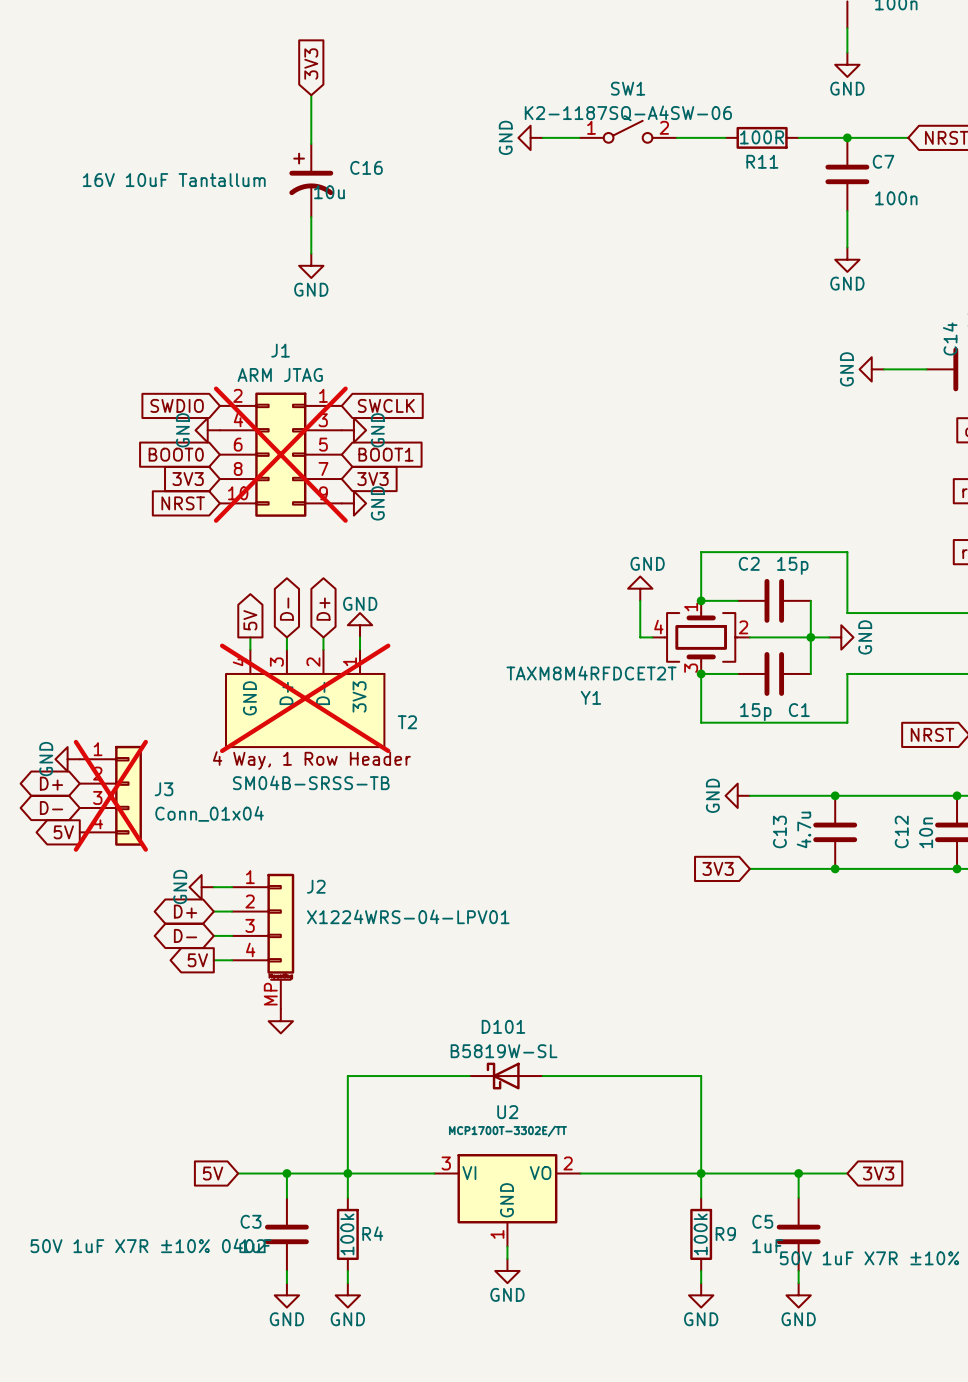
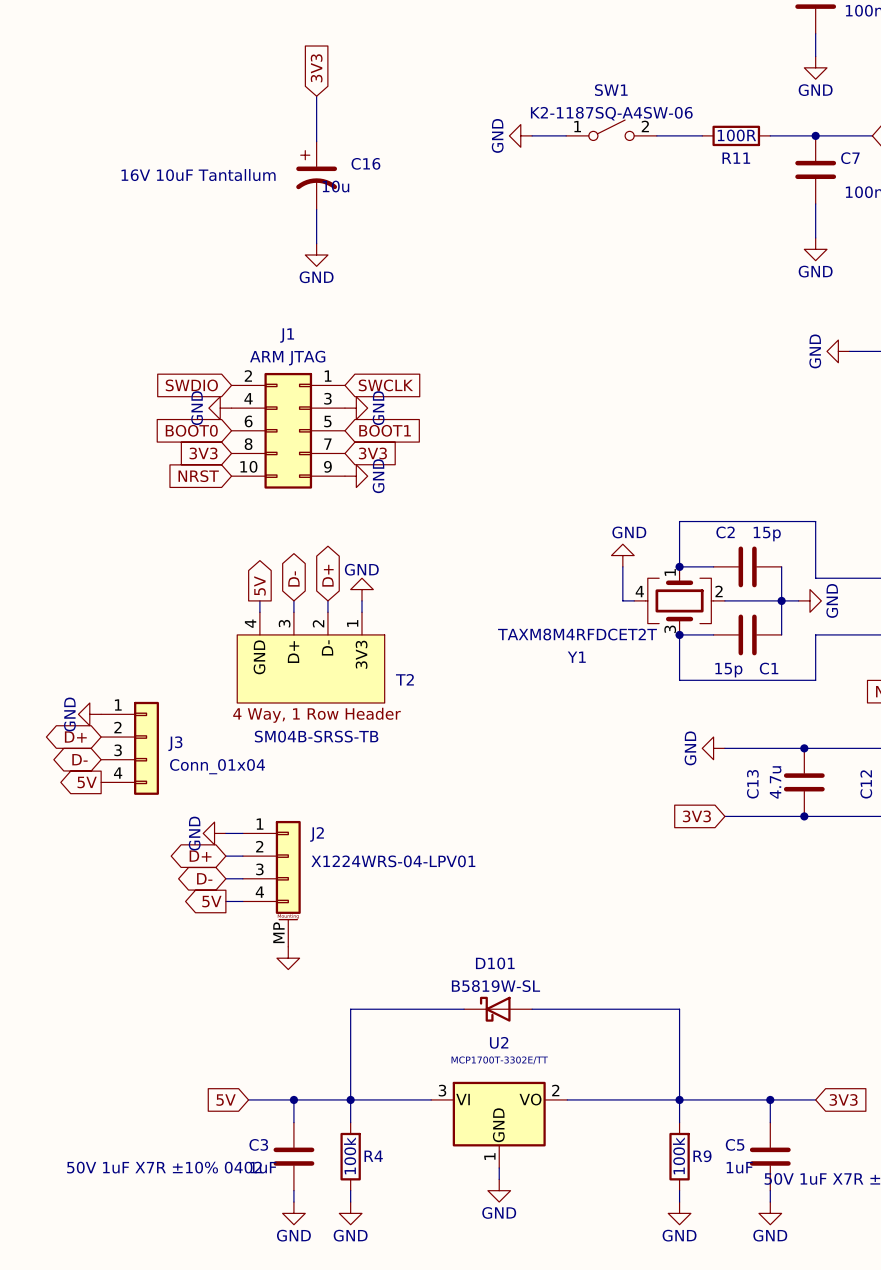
J1 do-not-place cross: (280, 454) -> none
T2 do-not-place cross: (305, 698) -> none
J3 do-not-place cross: (110, 795) -> none

